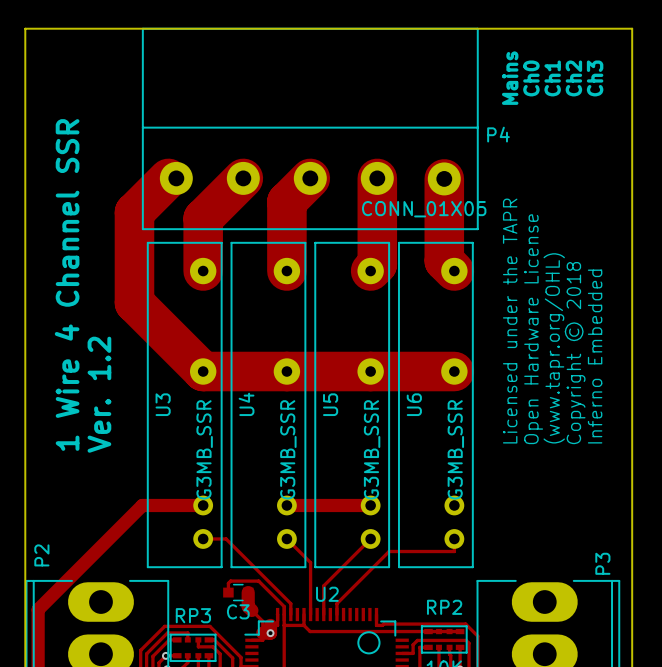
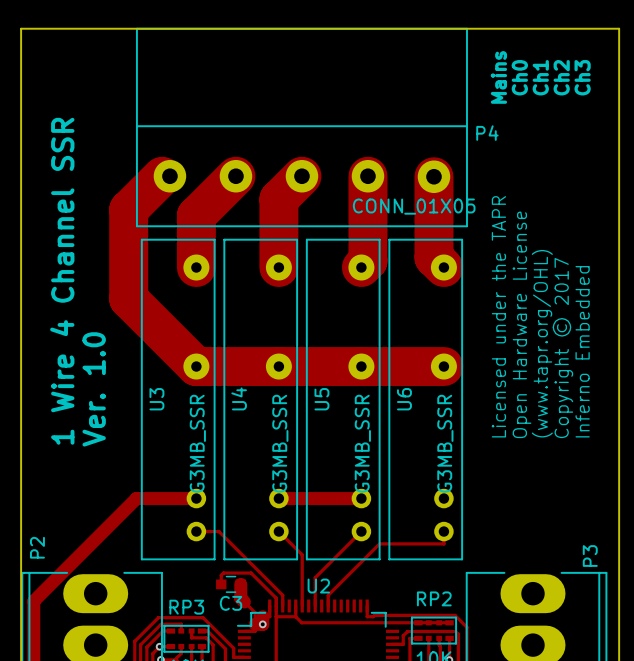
text: Copyright © 2018 (575, 353) -> Copyright © 2017 (562, 348)
text: Ver. 1.2 (99, 394) -> Ver. 1.0 (94, 389)
drawing: [357, 631, 381, 655] -> none

